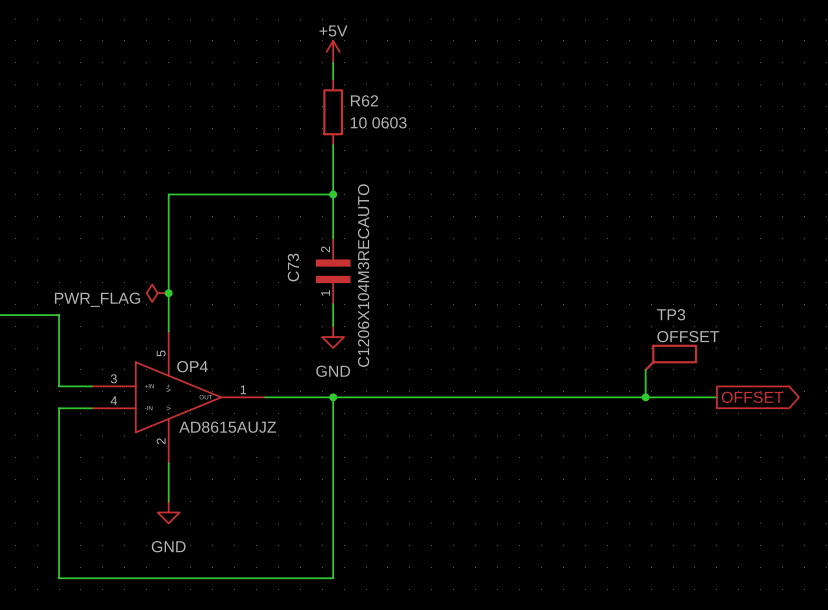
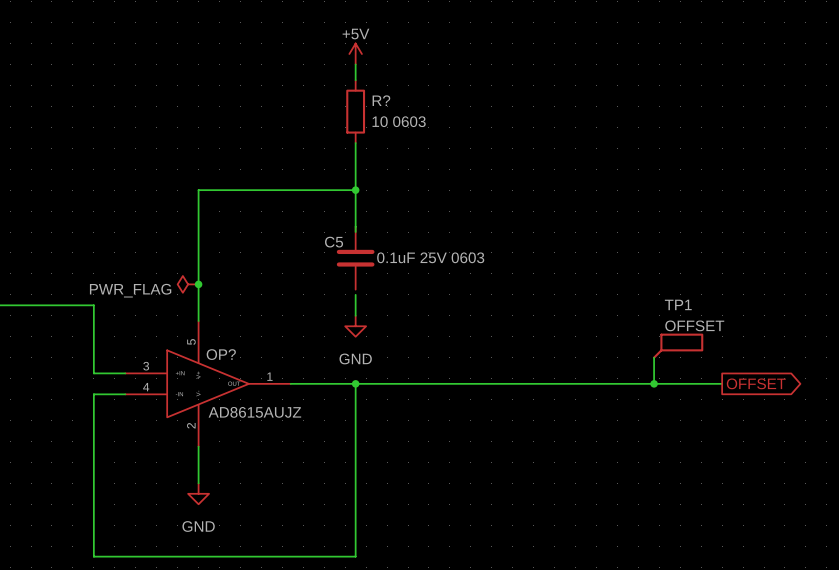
R62 name: R62 (364, 100) -> R? (381, 100)
C5: none -> 0.1uF 25V 0603 (355, 258)
C73: C1206X104M3RECAUTO (333, 271) -> none
TP3 name: TP3 (671, 314) -> TP1 (678, 304)
OP4 name: OP4 (192, 366) -> OP? (221, 354)

